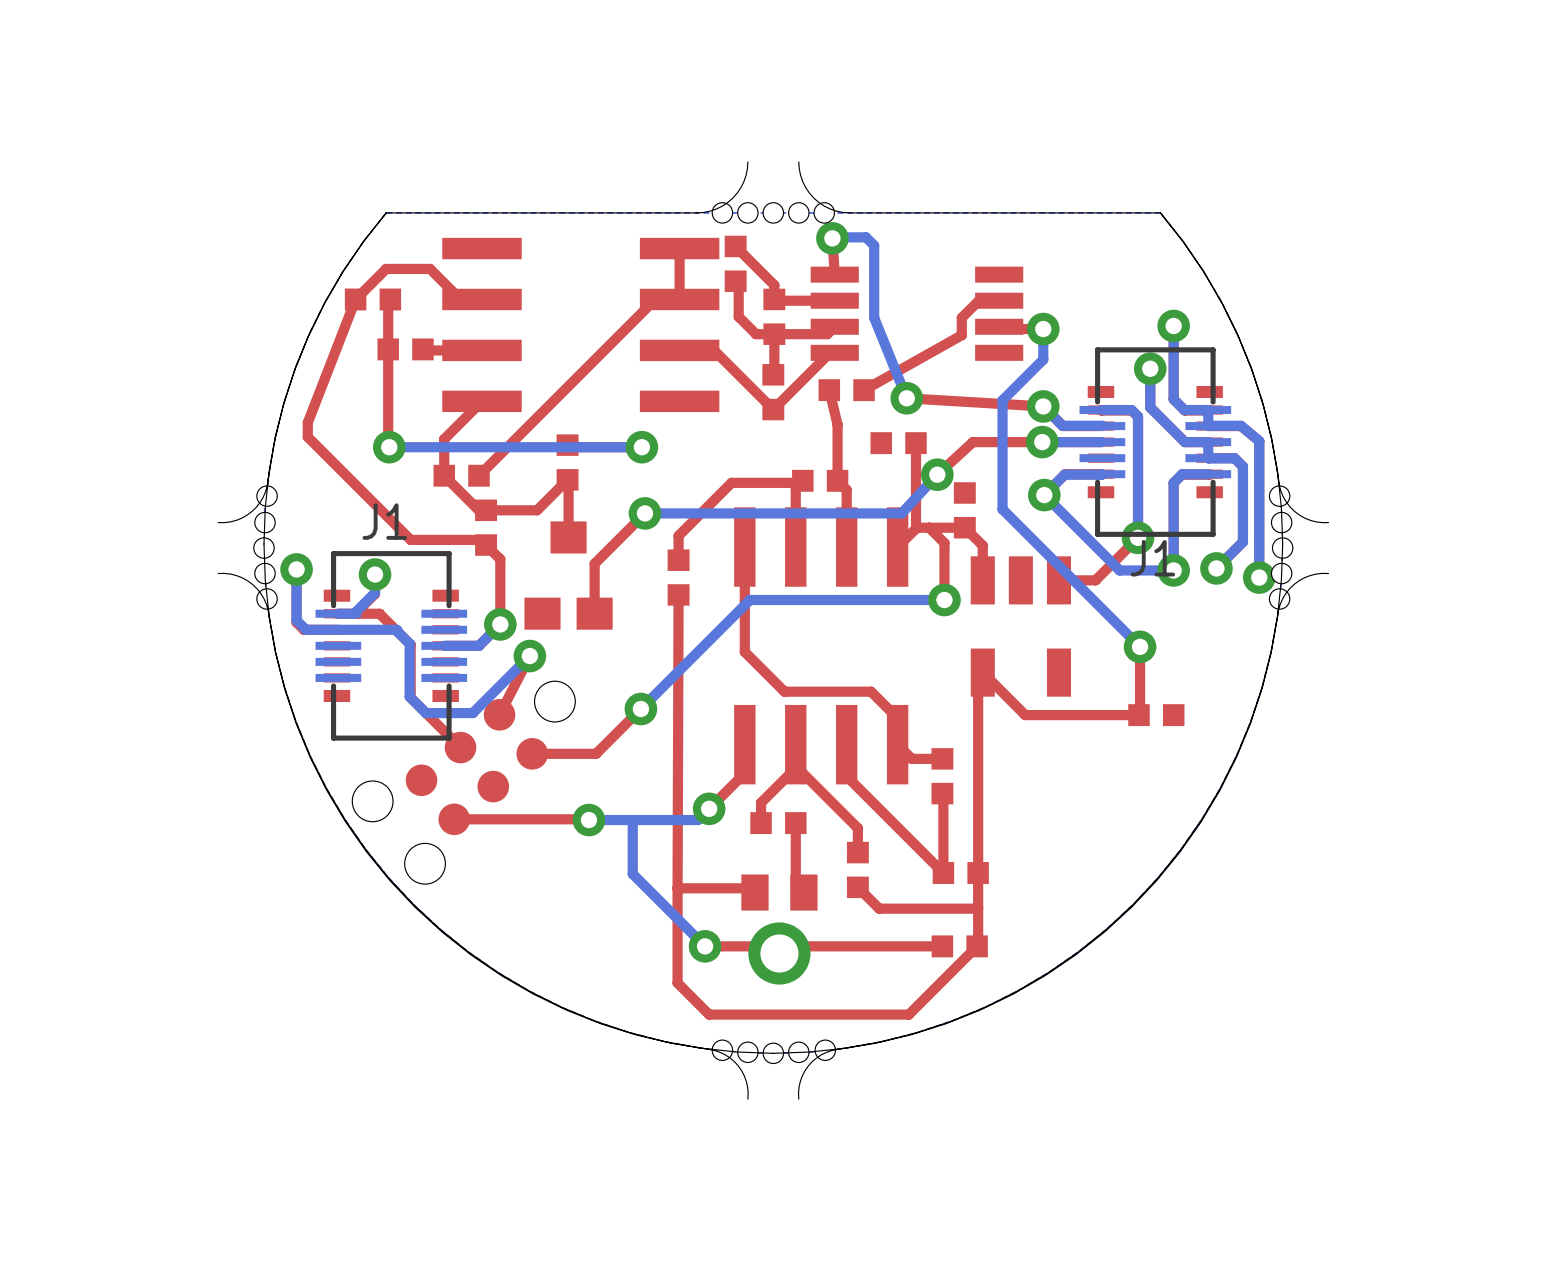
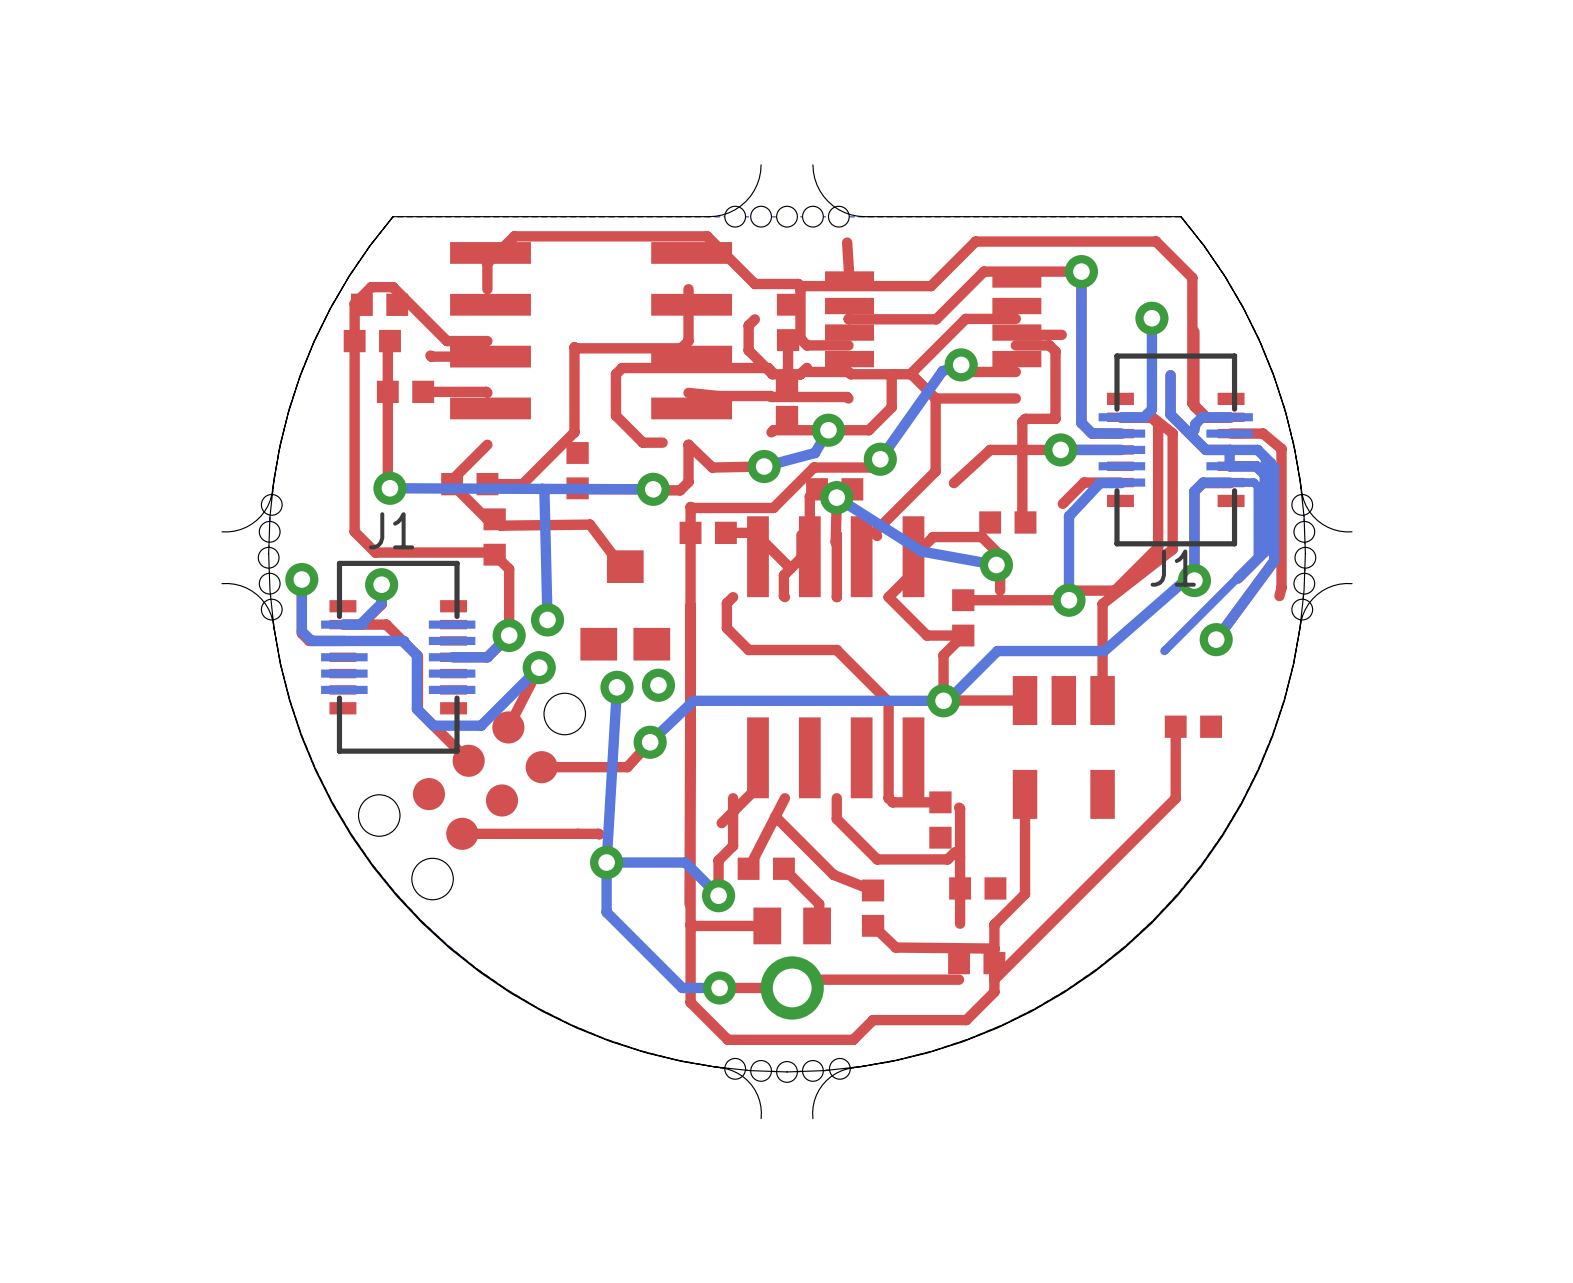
bottom track: (832, 238) (866, 237) (874, 245) (874, 317) (906, 398) -> none
via: (832, 238) -> none
top track: (735, 246) (774, 285) (775, 300) (834, 300) -> none
top track: (679, 248) (679, 299) (655, 299) (478, 475) -> (688, 289) (688, 341) (681, 348) (574, 347) (574, 432) (522, 484) (487, 484)
part: (735, 263) -> none
via: none -> (1081, 271)
top track: (735, 281) (738, 284) (738, 316) (756, 334) (827, 334) (834, 326) -> none
top track: none -> (803, 286) (800, 289) (800, 338) (806, 345) (848, 345)
top track: none -> (487, 289) (487, 263) (514, 236) (707, 236) (754, 284) (798, 284) (800, 286) (931, 286) (975, 241) (1156, 241) (1192, 277) (1192, 403) (1205, 416)
top track: (390, 299) (388, 301) (389, 447) -> none
top track: (481, 299) (460, 299) (430, 268) (386, 268) (355, 299) (307, 422) (307, 437) (410, 539) (480, 539) -> none
top track: (999, 300) (978, 300) (961, 317) (961, 335) (864, 390) -> none
via: none -> (1151, 318)
top track: none -> (754, 319) (748, 325) (748, 350) (772, 374) (800, 374) (806, 367)
top track: none -> (1015, 318) (965, 318) (910, 374)
bottom track: (1173, 325) (1173, 399) (1184, 410) -> (1194, 430) (1195, 424) (1202, 417) (1205, 417)
via: (1173, 325) -> none
bottom track: (1043, 329) (1043, 359) (1002, 400) (1002, 509) (1140, 646) -> none
via: (1043, 329) -> none
part: none -> (372, 341)
top track: none -> (390, 341) (387, 343) (387, 486) (389, 488)
top track: none -> (487, 341) (446, 341) (393, 287) (371, 287) (354, 303) (354, 531) (375, 552) (492, 552)
top track: none -> (1015, 345) (1049, 345) (1055, 351) (1055, 418) (1025, 418) (1022, 421) (1022, 519) (1025, 522)
part: (405, 349) -> none
top track: (679, 350) (714, 350) (773, 409) (830, 352) (834, 352) -> none
bottom track: none -> (961, 364) (942, 371) (880, 459)
top track: none -> (961, 364) (968, 371) (1015, 371)
via: none -> (961, 364)
top track: none -> (771, 371) (768, 368) (622, 368) (615, 374) (615, 415) (642, 442) (662, 442)
top track: none -> (802, 371) (911, 374) (935, 398)
top track: none -> (893, 374) (891, 376) (891, 407) (868, 430) (773, 430) (771, 432)
via: (1150, 368) -> none
part: none -> (405, 391)
top track: none -> (423, 391) (487, 392)
top track: none -> (688, 392) (718, 396) (848, 398)
top track: (829, 390) (837, 424) (837, 480) (846, 489) (846, 547) -> none
part: (846, 390) -> none
top track: none -> (935, 398) (935, 471) (874, 532) (877, 535)
top track: none -> (1015, 398) (935, 398)
top track: (906, 398) (1043, 406) (1062, 426) (1073, 426) -> (848, 319) (936, 319) (983, 271) (1081, 271) (1081, 422) (1092, 433)
via: (906, 398) -> none
top track: (481, 401) (444, 439) (444, 471) -> (487, 444) (452, 480)
bottom track: (1043, 406) (1062, 425) (1102, 425) -> (1081, 271) (1081, 422) (1092, 433) (1121, 433)
via: (1043, 406) -> none
top track: none -> (1147, 413) (1172, 433) (1172, 549) (1102, 603) (1102, 700)
bottom track: (1124, 410) (1131, 410) (1138, 416) (1138, 537) -> (1144, 417) (1151, 409) (1151, 318)
bottom track: (1208, 410) (1208, 426) (1240, 425) (1259, 441) (1259, 577) -> none
bottom track: none -> (828, 430) (815, 453) (764, 466)
via: none -> (828, 430)
bottom track: none -> (1229, 449) (1257, 449) (1271, 463) (1272, 470) (1265, 459) (1265, 466) (1274, 467) (1274, 560) (1216, 639)
part: (898, 443) -> none
top track: (916, 443) (916, 528) -> none
via position: (389, 447) -> (389, 488)
bottom track: (641, 447) (389, 447) -> none
via: (641, 447) -> none
top track: none -> (880, 459) (872, 467) (813, 467) (773, 507) (690, 506) (690, 924)
via: none -> (880, 459)
top track: none -> (764, 466) (712, 467) (688, 444) (688, 482) (680, 490) (590, 489)
via: none -> (764, 466)
bottom track: (937, 474) (901, 513) (644, 513) -> none
via: (937, 474) -> none
bottom track: (1080, 474) (1064, 474) (1044, 495) (1119, 570) (1173, 570) (1173, 562) -> (1100, 483) (1068, 516) (1068, 600)
bottom track: none -> (1229, 482) (1254, 482) (1257, 486) (1257, 557) (1164, 651)
bottom track: none -> (389, 488) (653, 489)
bottom track: none -> (542, 488) (544, 490) (547, 619)
via: none -> (653, 489)
top track: (800, 482) (731, 482) (678, 535) (678, 560) -> none
bottom track: none -> (836, 497) (921, 551) (996, 565)
top track: none -> (836, 497) (836, 597)
via: none -> (836, 497)
via: (1044, 495) -> none
top track: (486, 510) (537, 510) (567, 479) (568, 537) -> (494, 519) (500, 525) (590, 524) (621, 566) (625, 566)
part rotation: 0° (964, 510) -> 90° clockwise (1007, 522)
top track: (644, 513) (594, 563) (594, 613) -> none
via: (644, 513) -> none
top track: none -> (725, 532) (754, 532) (790, 568)
top track: none -> (801, 534) (801, 557) (783, 575) (784, 597)
top track: none -> (912, 535) (912, 573) (888, 597) (927, 635) (963, 635) (943, 655) (943, 700)
top track: (929, 527) (944, 543) (944, 600) -> none
via: (1138, 537) -> none
top track: (744, 547) (744, 651) (784, 691) (871, 691) (897, 718) (897, 744) (911, 758) (942, 758) -> none
via: none -> (996, 565)
bottom track: none -> (1194, 572) (1104, 651) (997, 651) (947, 700) (693, 700) (650, 742)
via: (1216, 568) -> none
part position: (568, 575) -> (625, 605)
part rotation: 0° (678, 577) -> 90° clockwise (708, 532)
part position: (678, 577) -> (708, 532)
via: (1259, 577) -> none
top track: none -> (733, 597) (726, 603) (726, 628) (748, 650) (836, 650) (888, 701) (888, 798) (892, 802) (940, 802)
top track: none -> (1068, 600) (963, 600)
via: none -> (1068, 600)
bottom track: (944, 600) (749, 600) (640, 709) -> none
via: (944, 600) -> none
part: none -> (963, 617)
via: none -> (547, 619)
part position: (1020, 626) -> (1063, 747)
via: none -> (1216, 639)
top track: (1140, 646) (1138, 715) (1025, 715) (982, 672) (978, 677) (978, 945) (908, 1014) (709, 1014) (677, 983) (677, 888) (750, 888) (754, 892) -> none
via: (1140, 646) -> none
via: none -> (658, 685)
bottom track: none -> (616, 687) (606, 862)
via: none -> (616, 687)
via: none -> (943, 700)
top track: none -> (1025, 700) (943, 700)
top track: (640, 709) (596, 753) -> (650, 742) (627, 767) (606, 767)
via position: (640, 709) -> (650, 742)
top track: none -> (1175, 726) (1175, 798) (994, 979)
part position: (1156, 715) -> (1193, 726)
top track: (846, 744) (846, 776) (943, 873) -> (960, 923) (960, 888)
top track: (796, 767) (761, 802) (761, 823) -> none
top track: (796, 767) (857, 828) (857, 852) -> none
part position: (942, 776) -> (940, 820)
top track: none -> (1025, 794) (1025, 894) (994, 924) (994, 992) (966, 1020) (873, 1020) (853, 1039) (727, 1039) (690, 1002) (690, 924)
top track: none -> (733, 798) (733, 845) (718, 860) (718, 895)
top track: none -> (784, 798) (748, 868)
top track: none -> (836, 798) (836, 818) (877, 859) (947, 859) (954, 852)
top track: none -> (775, 816) (833, 874) (873, 890)
bottom track: (709, 808) (697, 820) (588, 820) -> none
via: (709, 808) -> none
via position: (588, 820) -> (606, 862)
bottom track: (632, 820) (632, 874) (705, 946) -> none
part position: (778, 823) -> (766, 868)
top track: (795, 823) (795, 884) (803, 892) -> none
bottom track: none -> (606, 862) (606, 912) (682, 987) (719, 987)
bottom track: none -> (606, 862) (685, 862) (718, 895)
top track: none -> (783, 868) (819, 904) (819, 923) (817, 925)
part position: (857, 869) -> (873, 908)
via: none -> (718, 895)
top track: (857, 887) (879, 908) (978, 908) -> none
top track: none -> (690, 924) (767, 925)
top track: none -> (873, 925) (895, 947) (994, 948)
part position: (779, 929) -> (792, 963)
via position: (705, 946) -> (719, 987)
top track: (942, 946) (705, 946) -> none
top track: none -> (959, 979) (803, 979) (792, 987) (719, 987)

